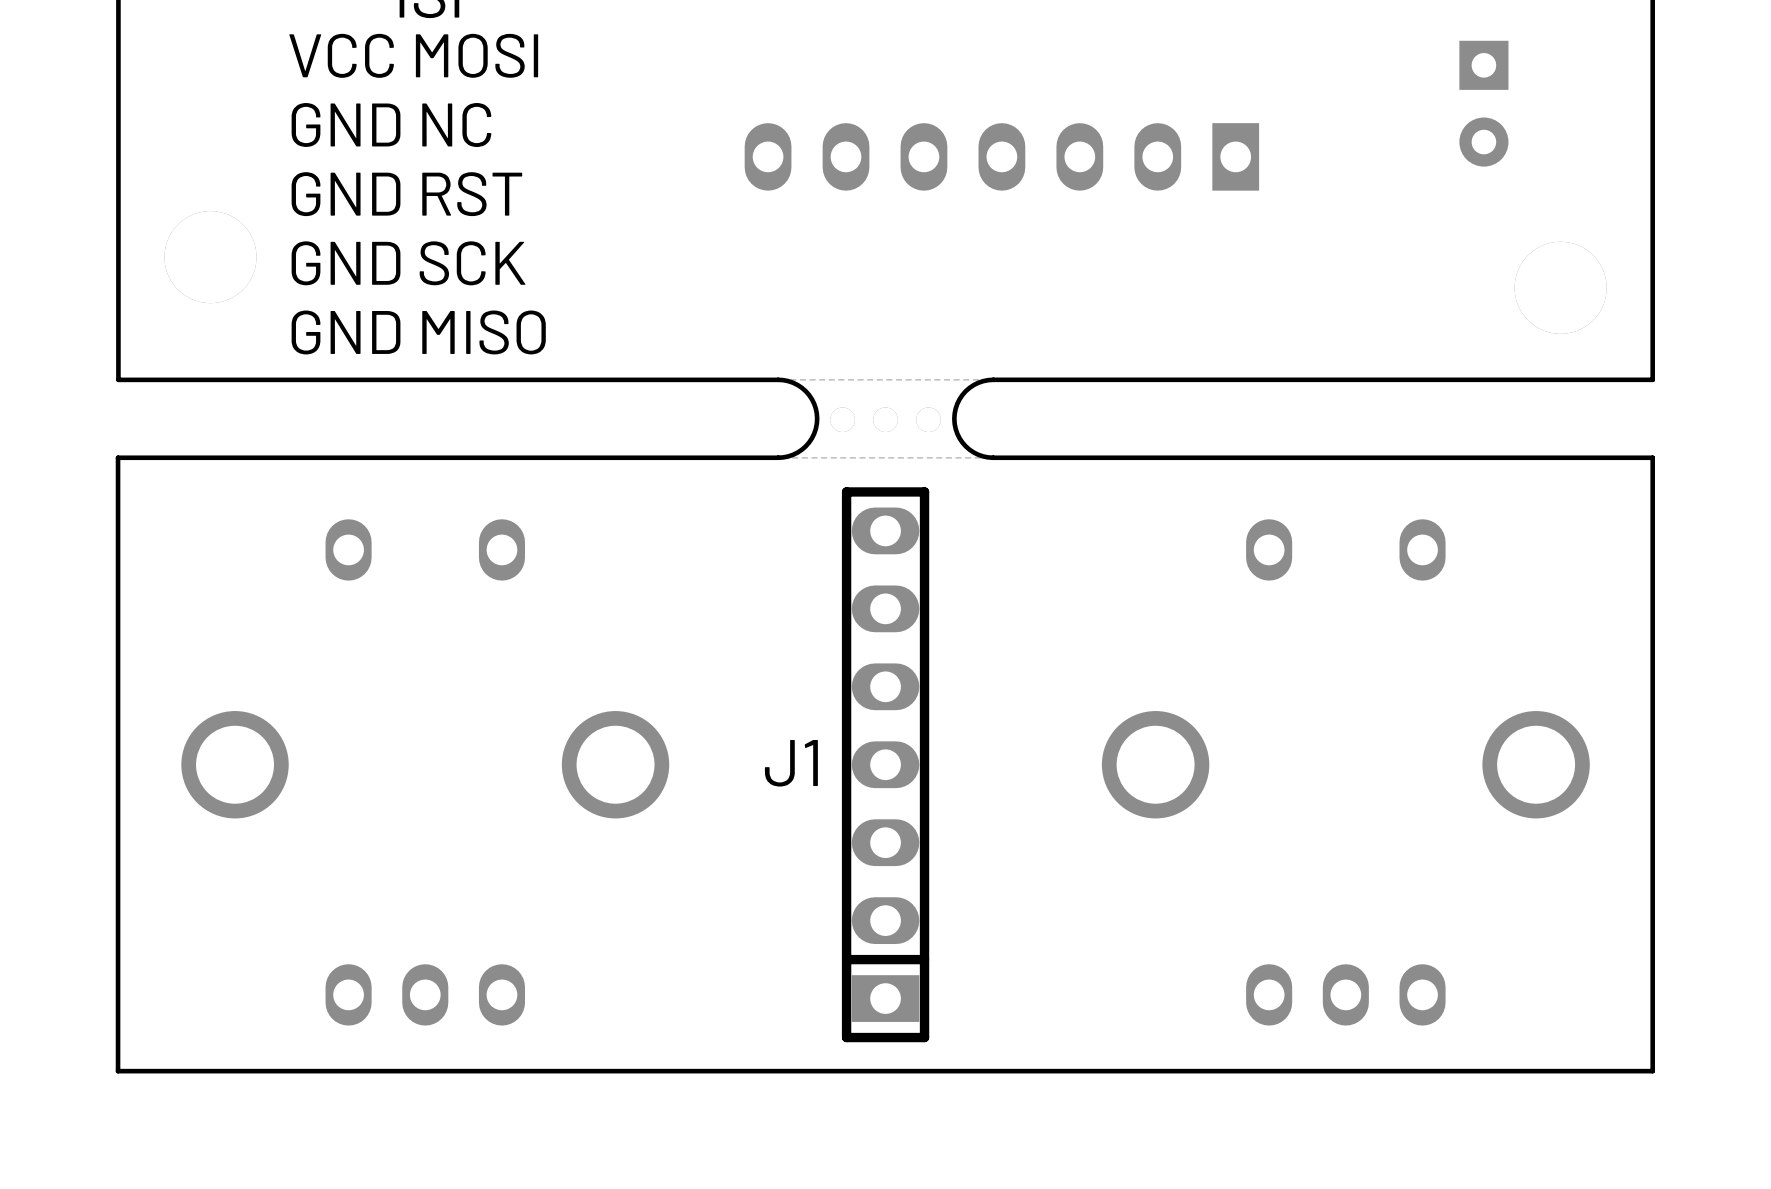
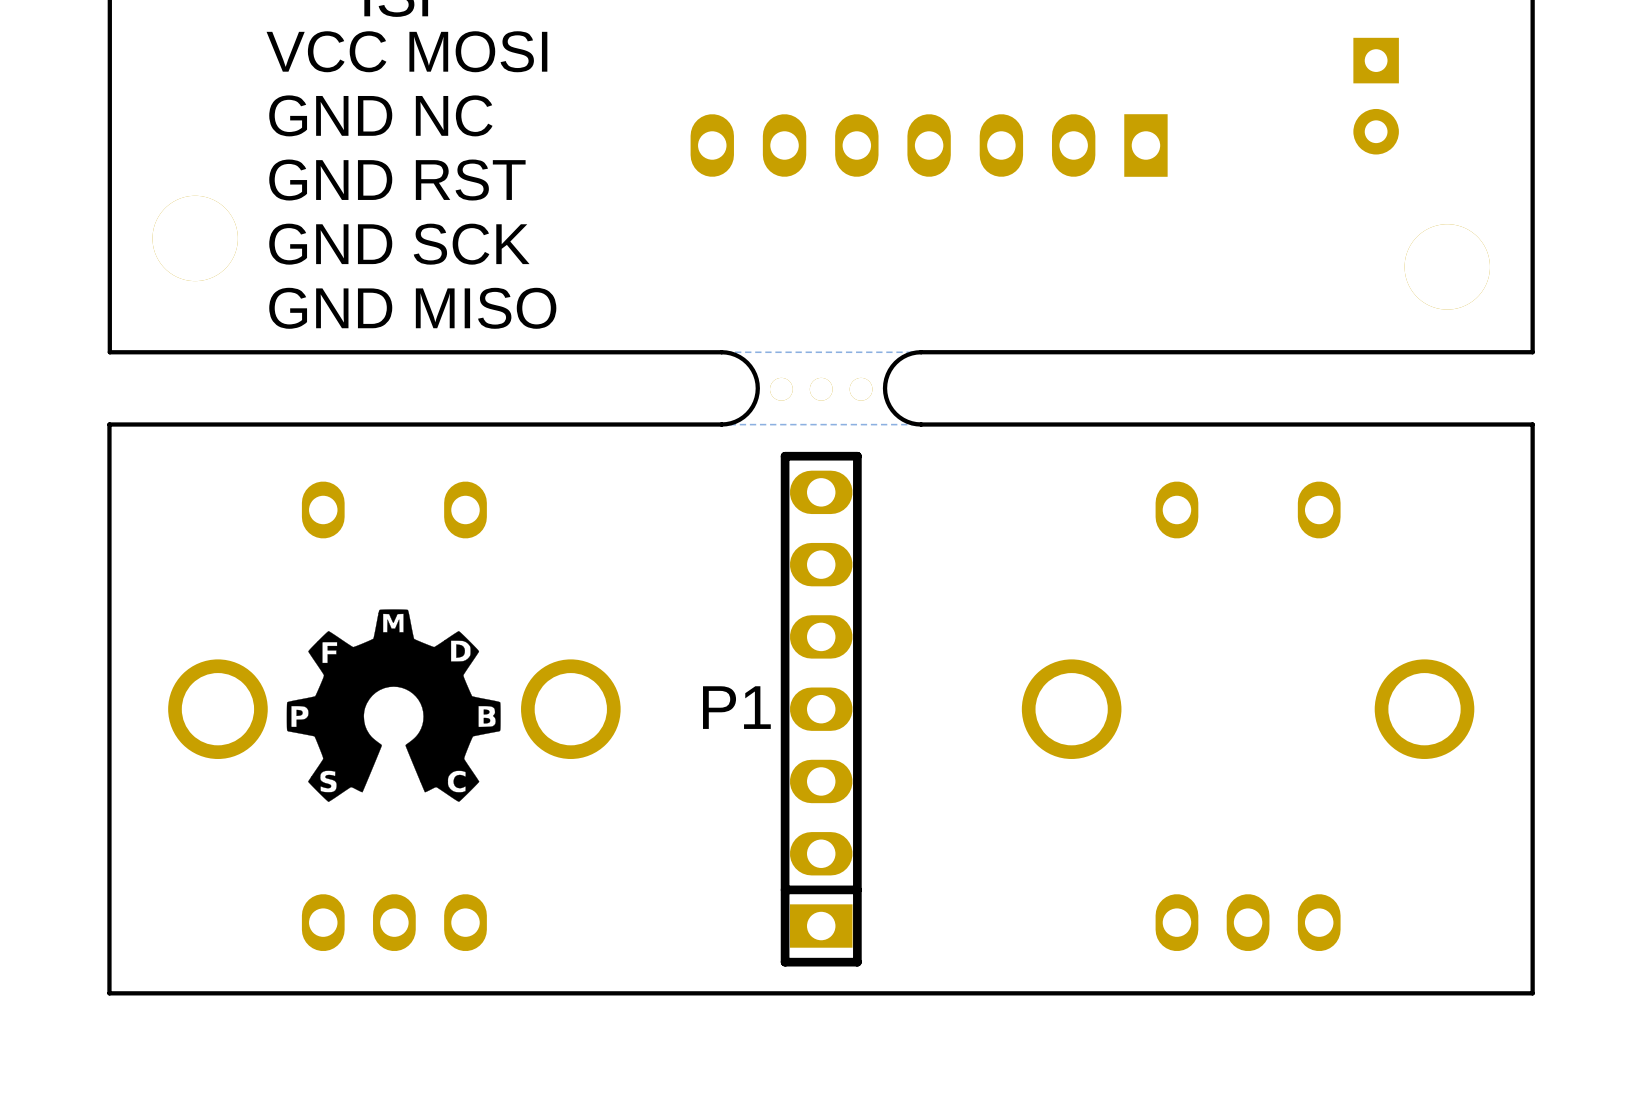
drawing: none -> [286, 609, 501, 802]
J1 name: J1 (791, 763) -> P1 (736, 707)

